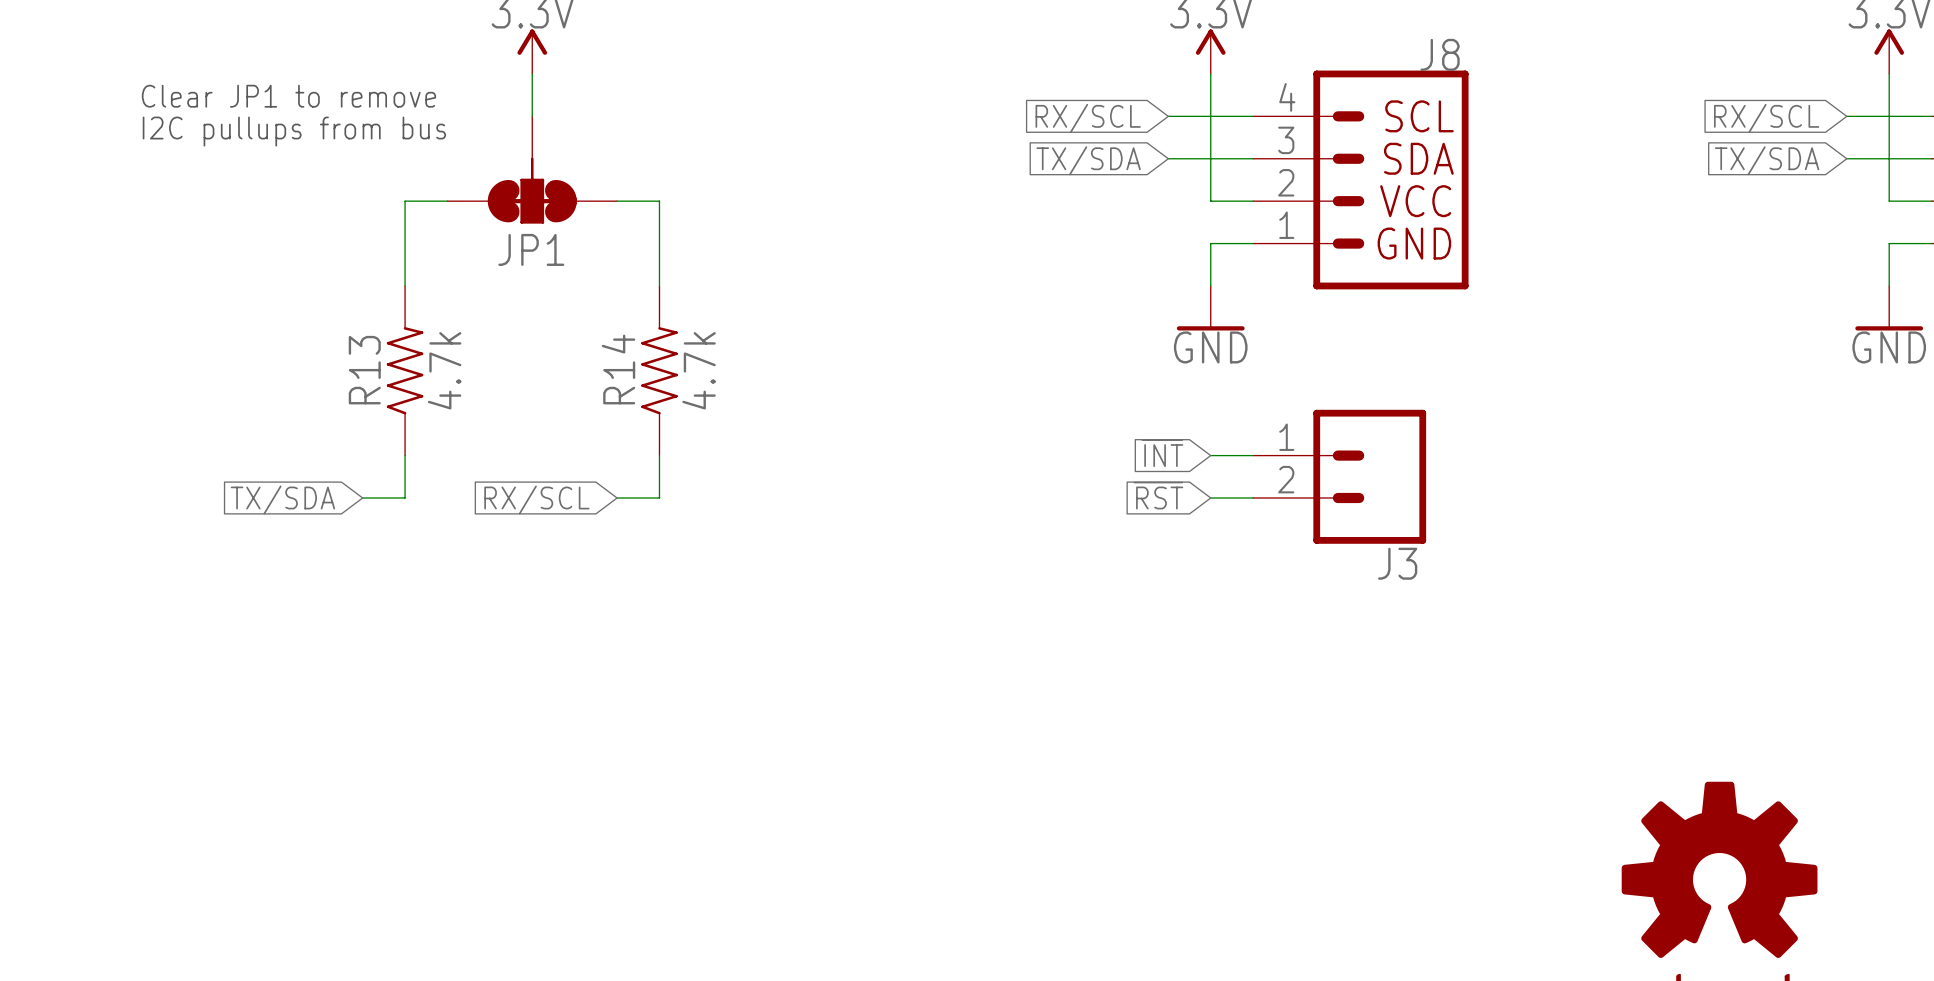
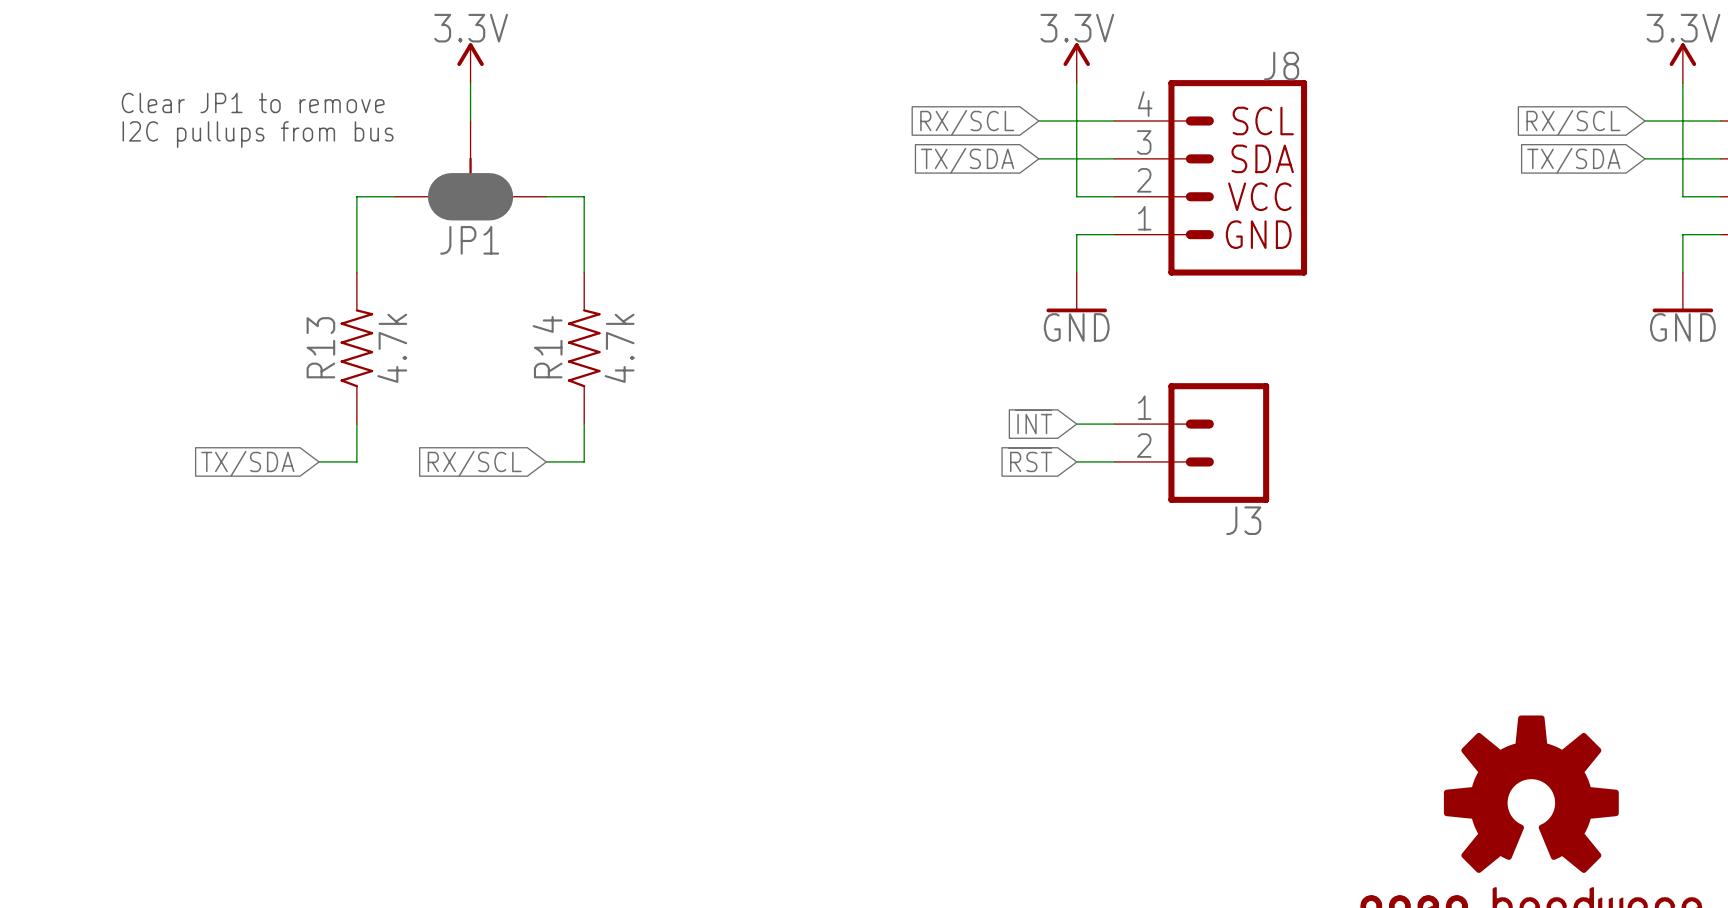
JP1 symbol: [447, 116, 618, 224] -> [394, 120, 547, 221]

